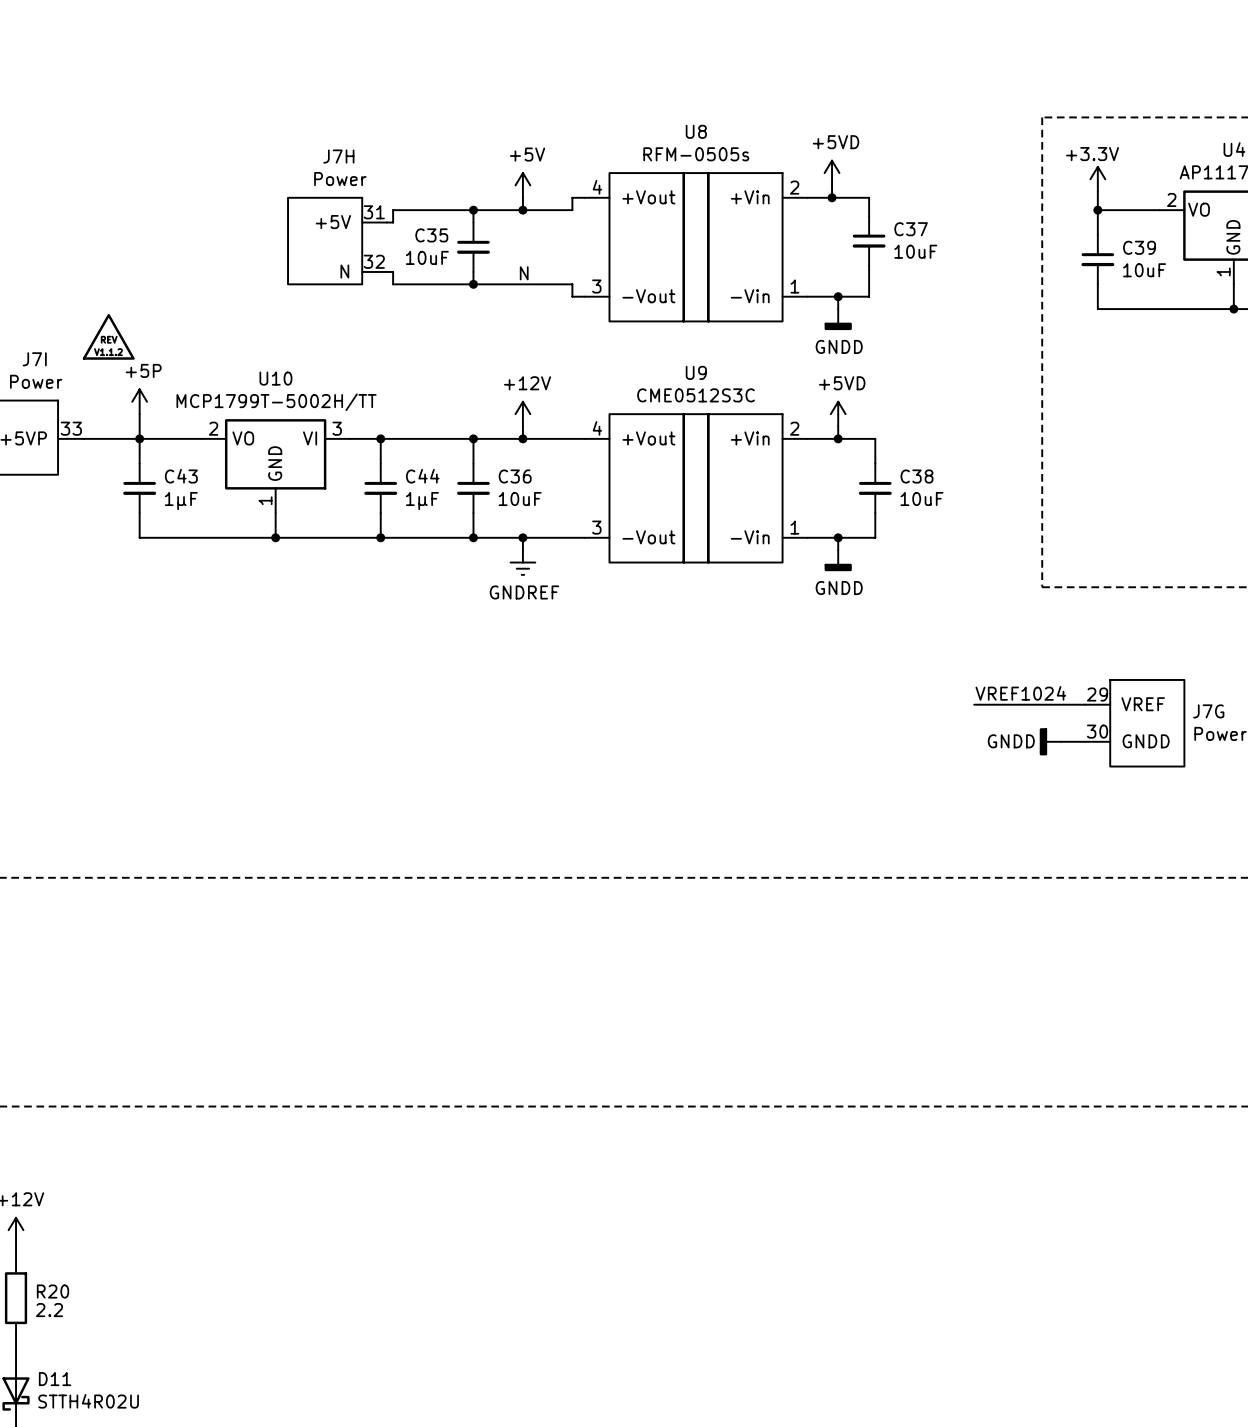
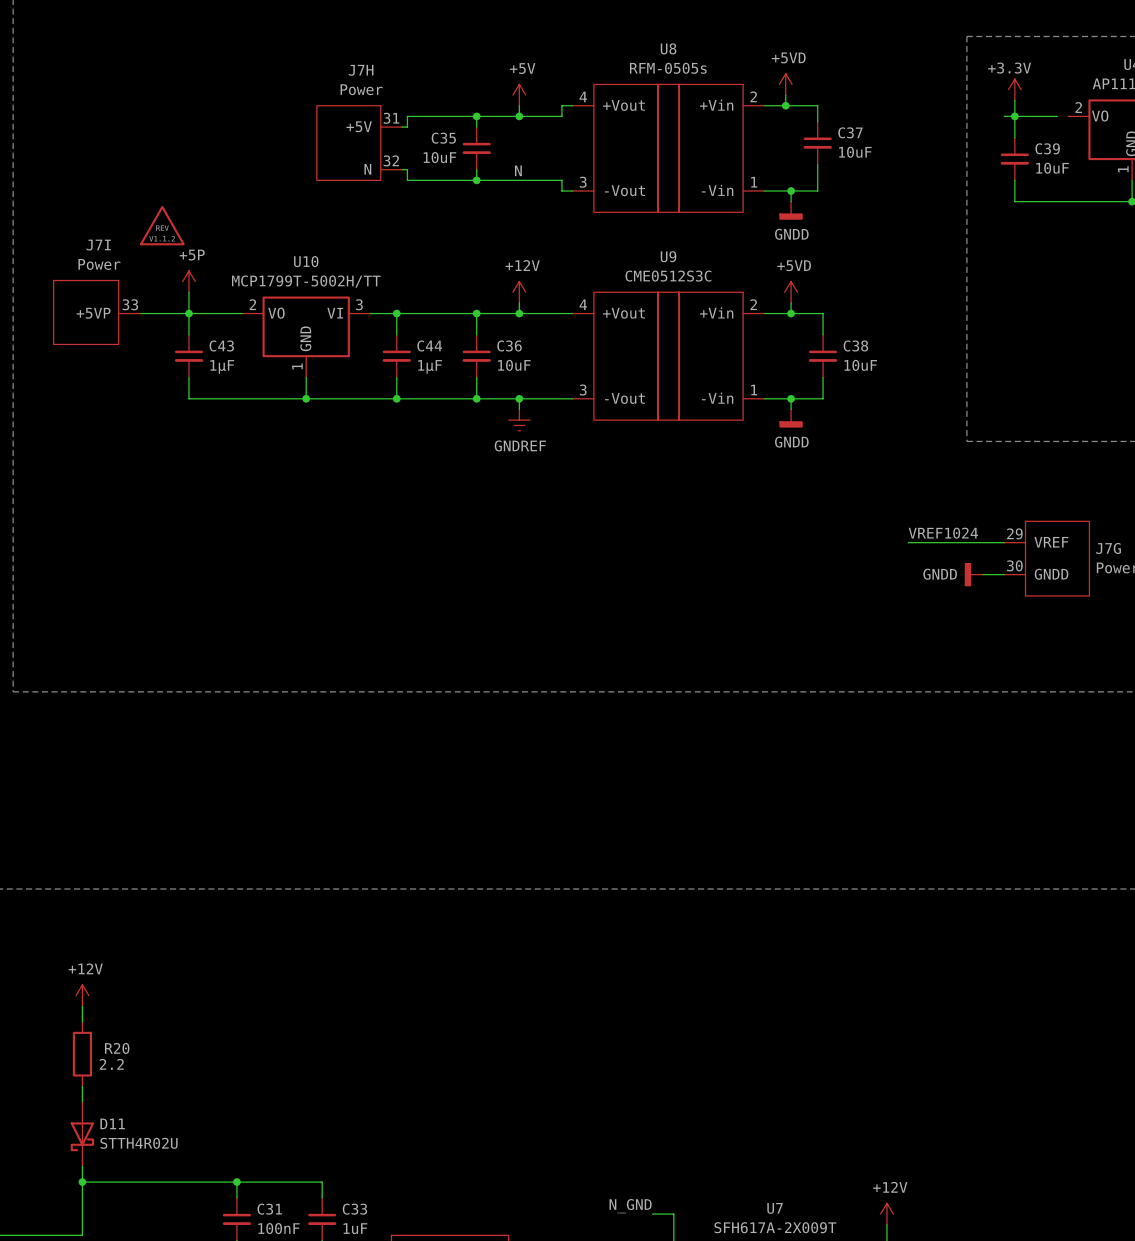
wire: (1147, 210) (1159, 210) -> (1004, 116) (1014, 116)

